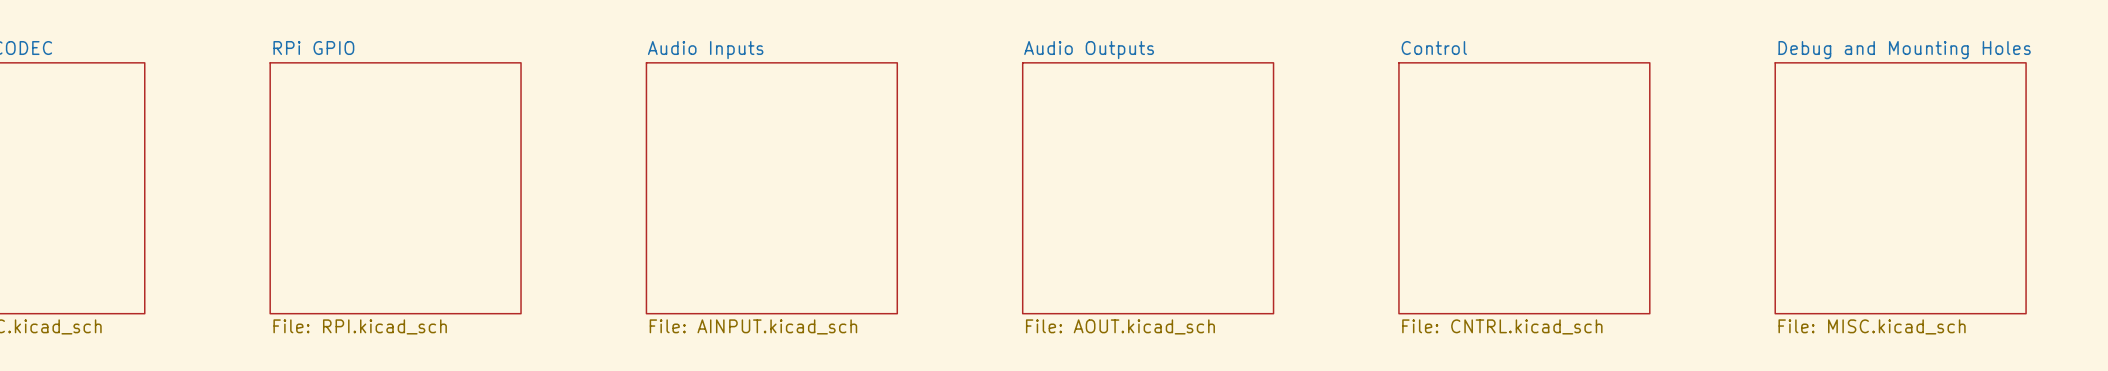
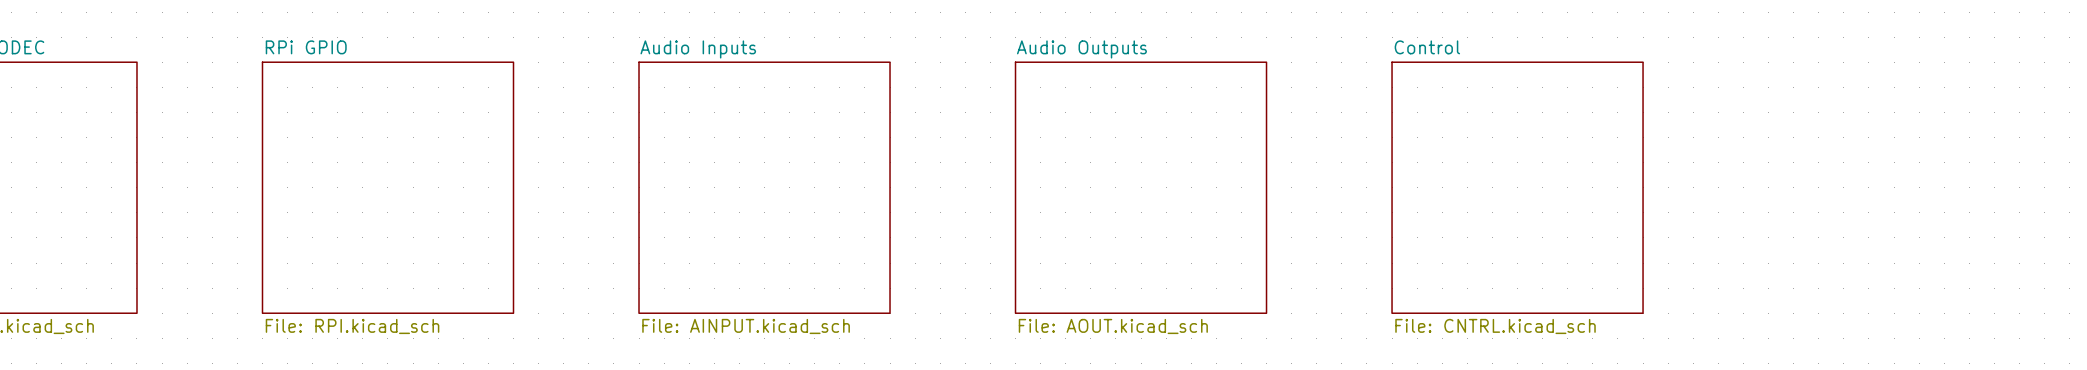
sheet Debug and Mounting Holes: File: MISC.kicad_sch (1900, 188) -> none

